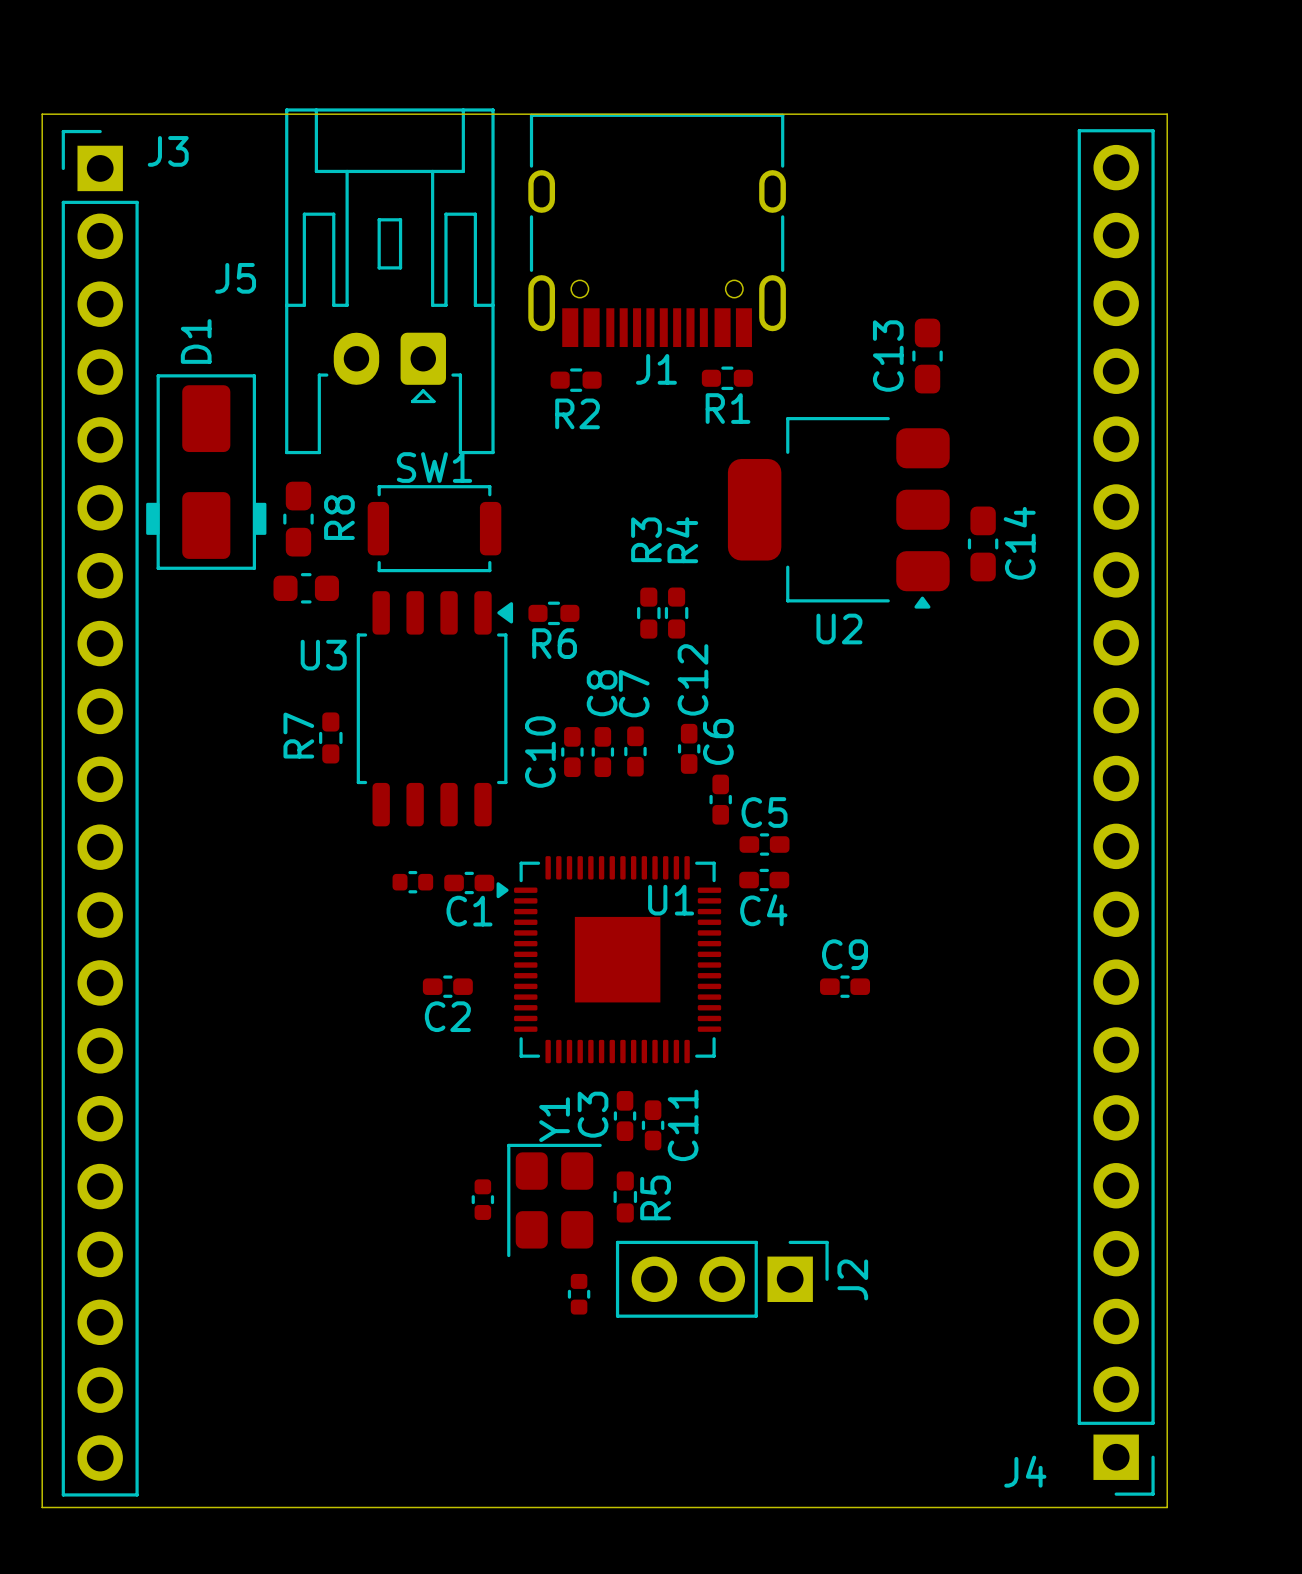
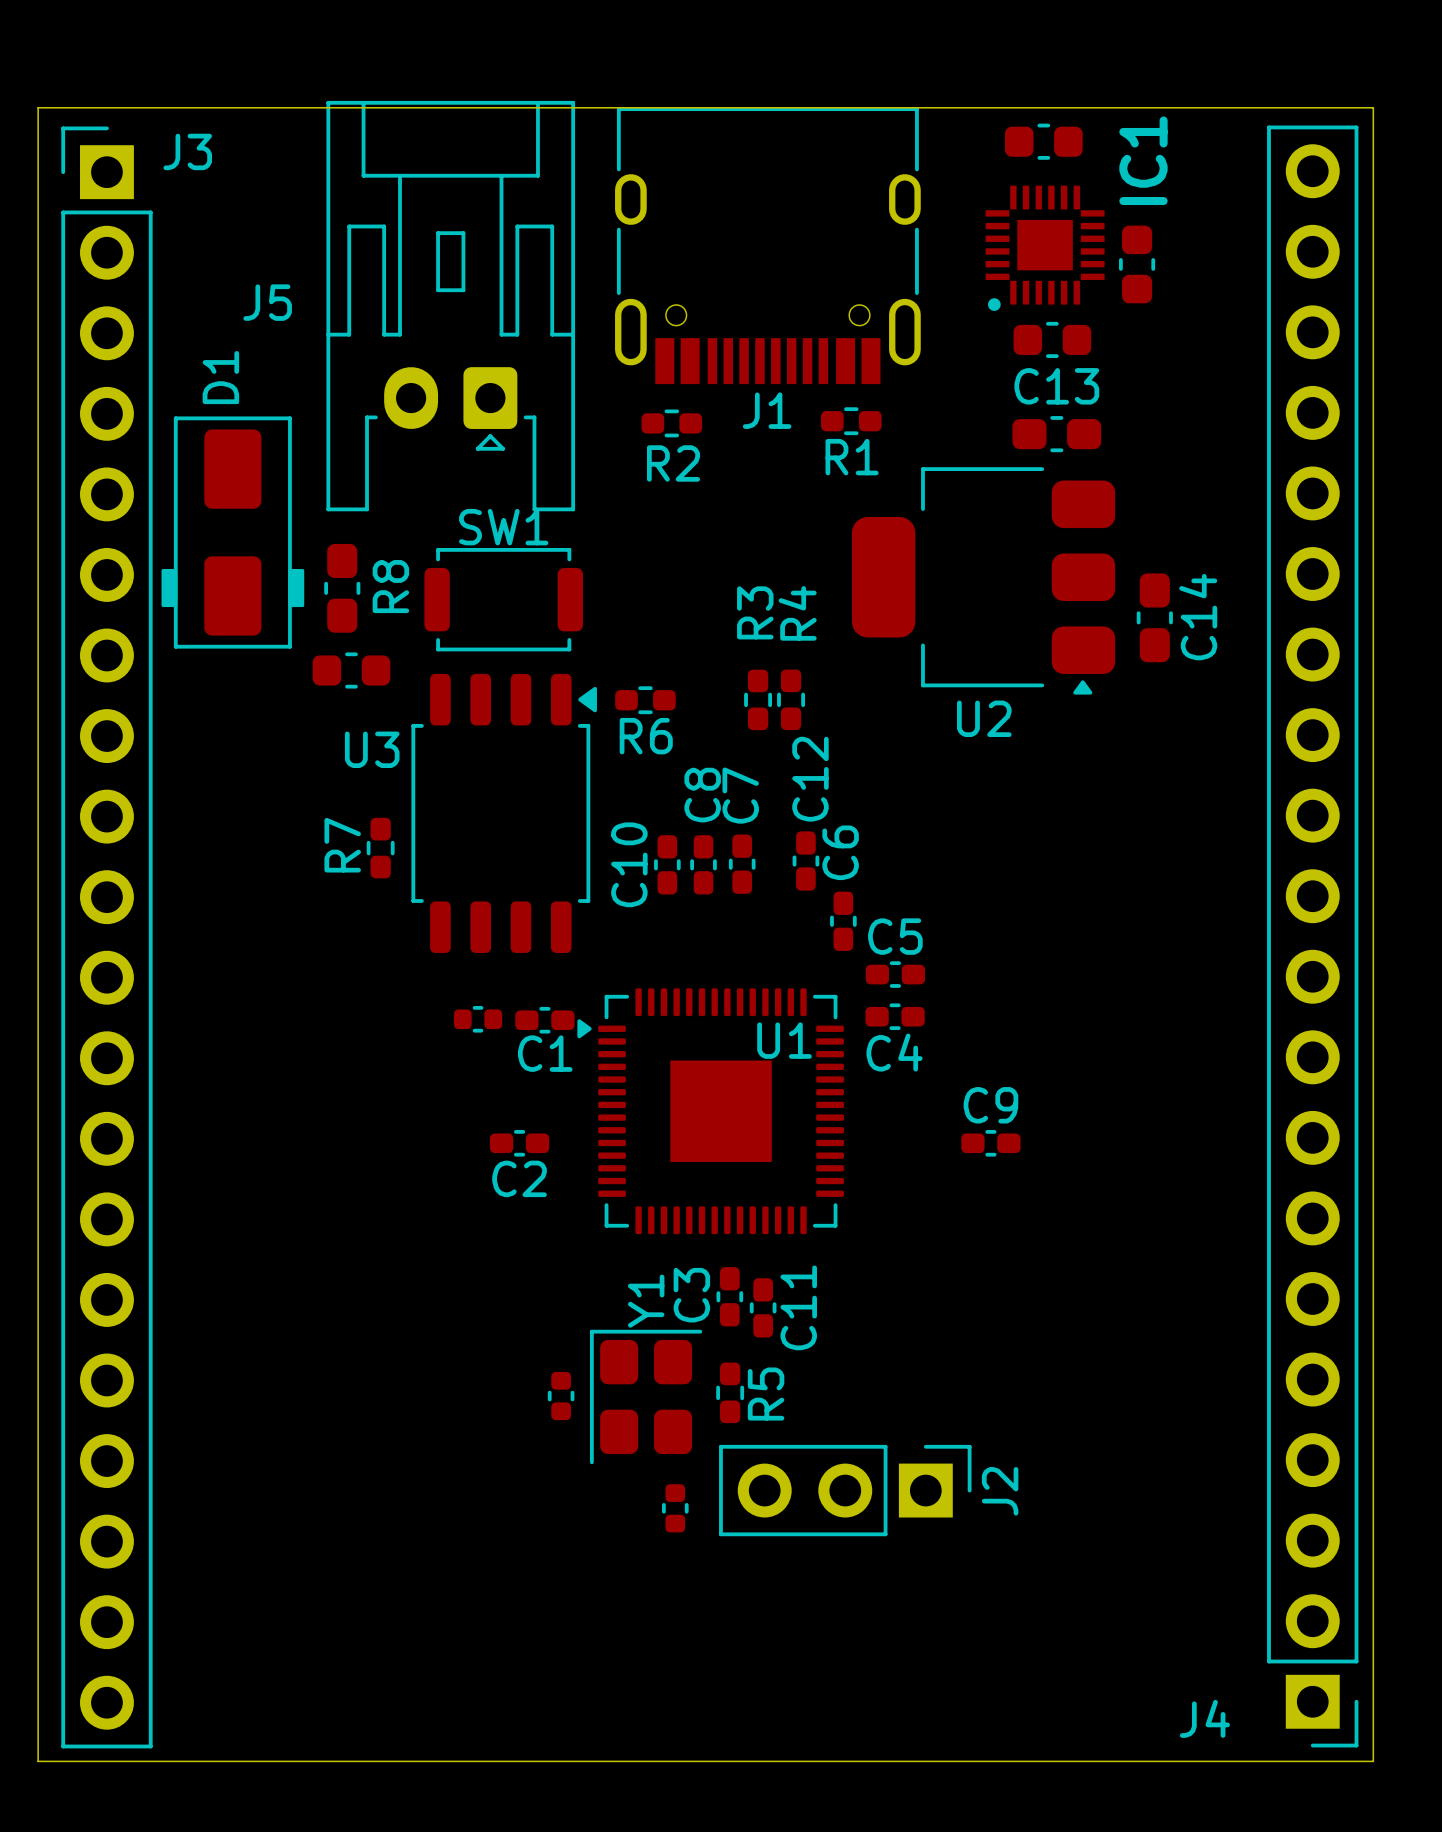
part: none -> (1043, 141)
IC1: none -> (1045, 248)
part: none -> (1137, 264)
part: none -> (1052, 339)
C13 rotation: 0° (927, 356) -> 90° clockwise (1056, 434)

